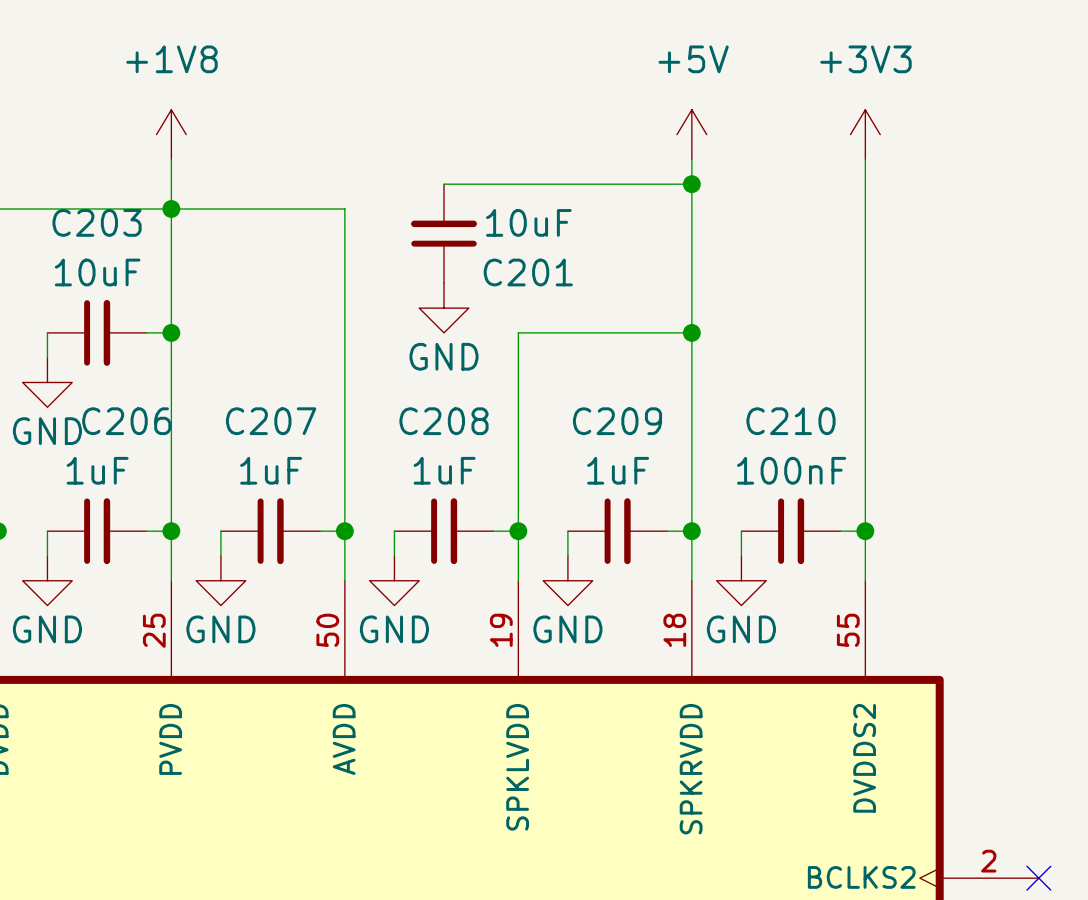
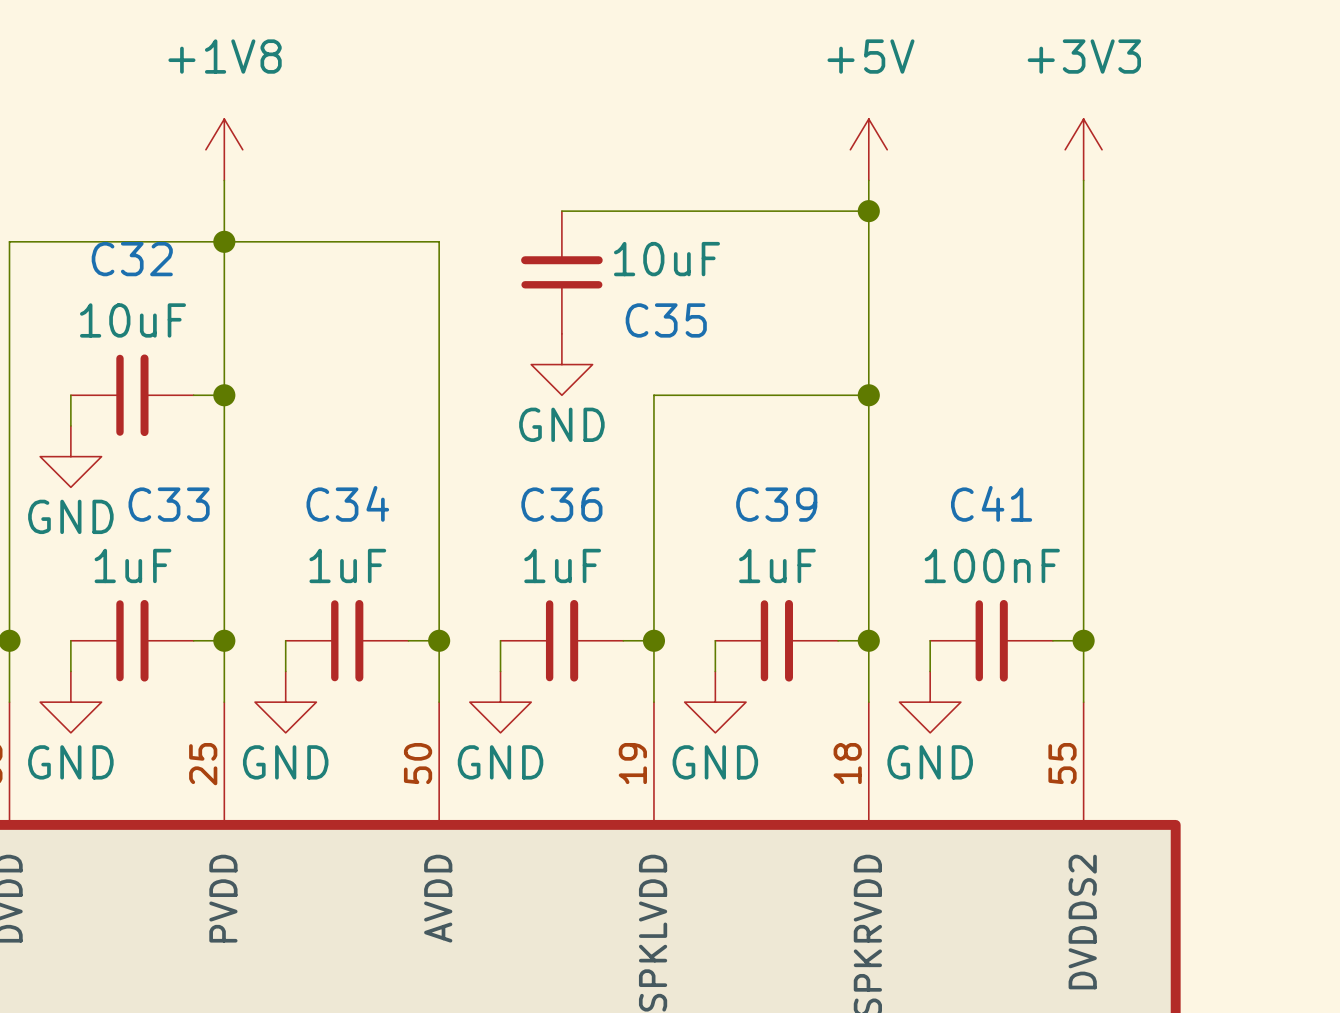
C203 name: C203 (97, 222) -> C32 (132, 259)
C201 name: C201 (528, 272) -> C35 (666, 320)
C206 name: C206 (126, 421) -> C33 (169, 504)
C207 name: C207 (271, 421) -> C34 (347, 503)
C208 name: C208 (444, 421) -> C36 (561, 504)
C209 name: C209 (617, 421) -> C39 (776, 504)
C210 name: C210 (791, 421) -> C41 (991, 503)

